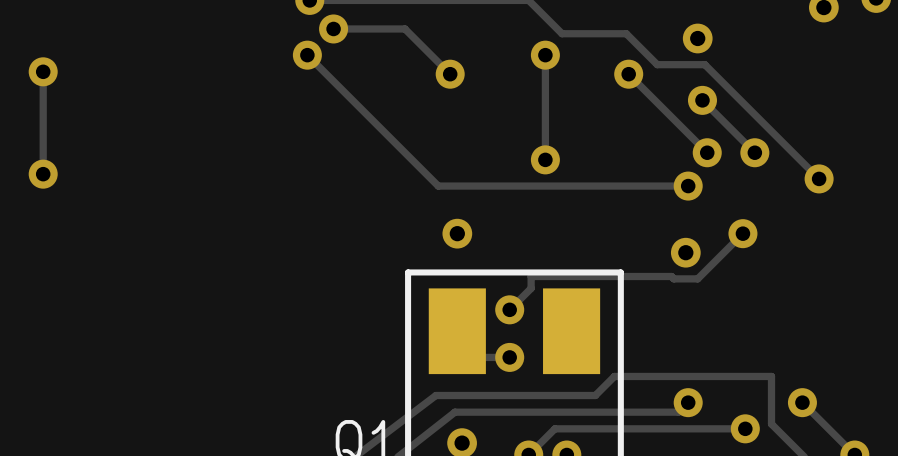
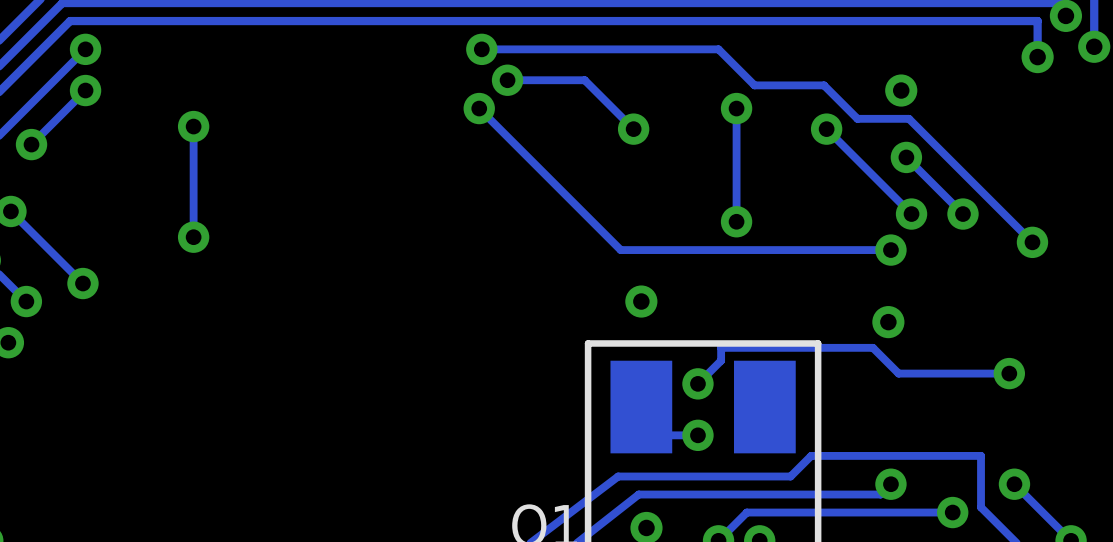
track: (742, 233) (697, 278) (673, 278) -> (1009, 373) (898, 373) (875, 350)
via position: (742, 233) -> (1009, 373)

